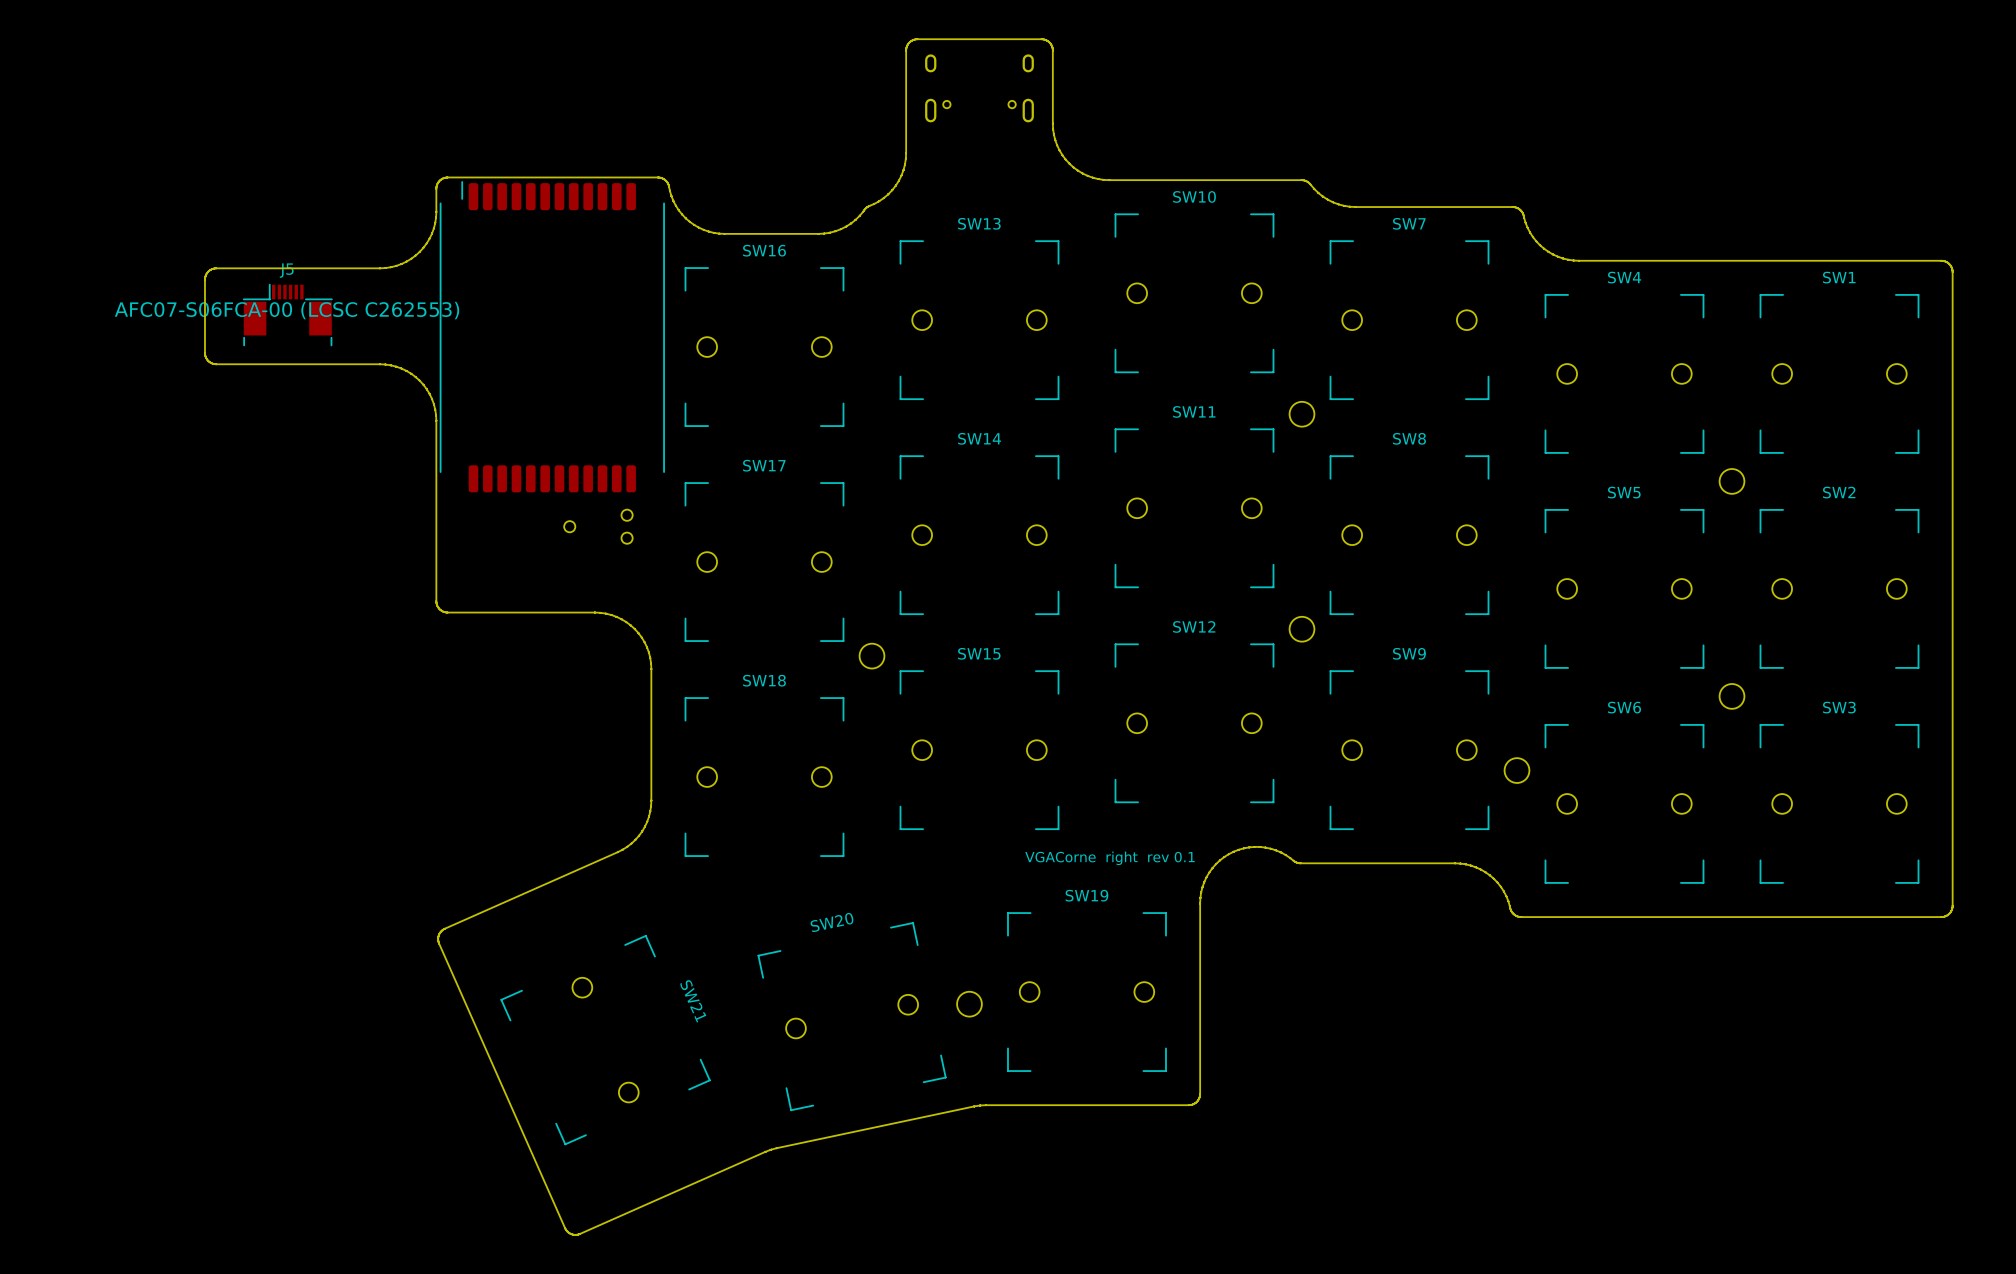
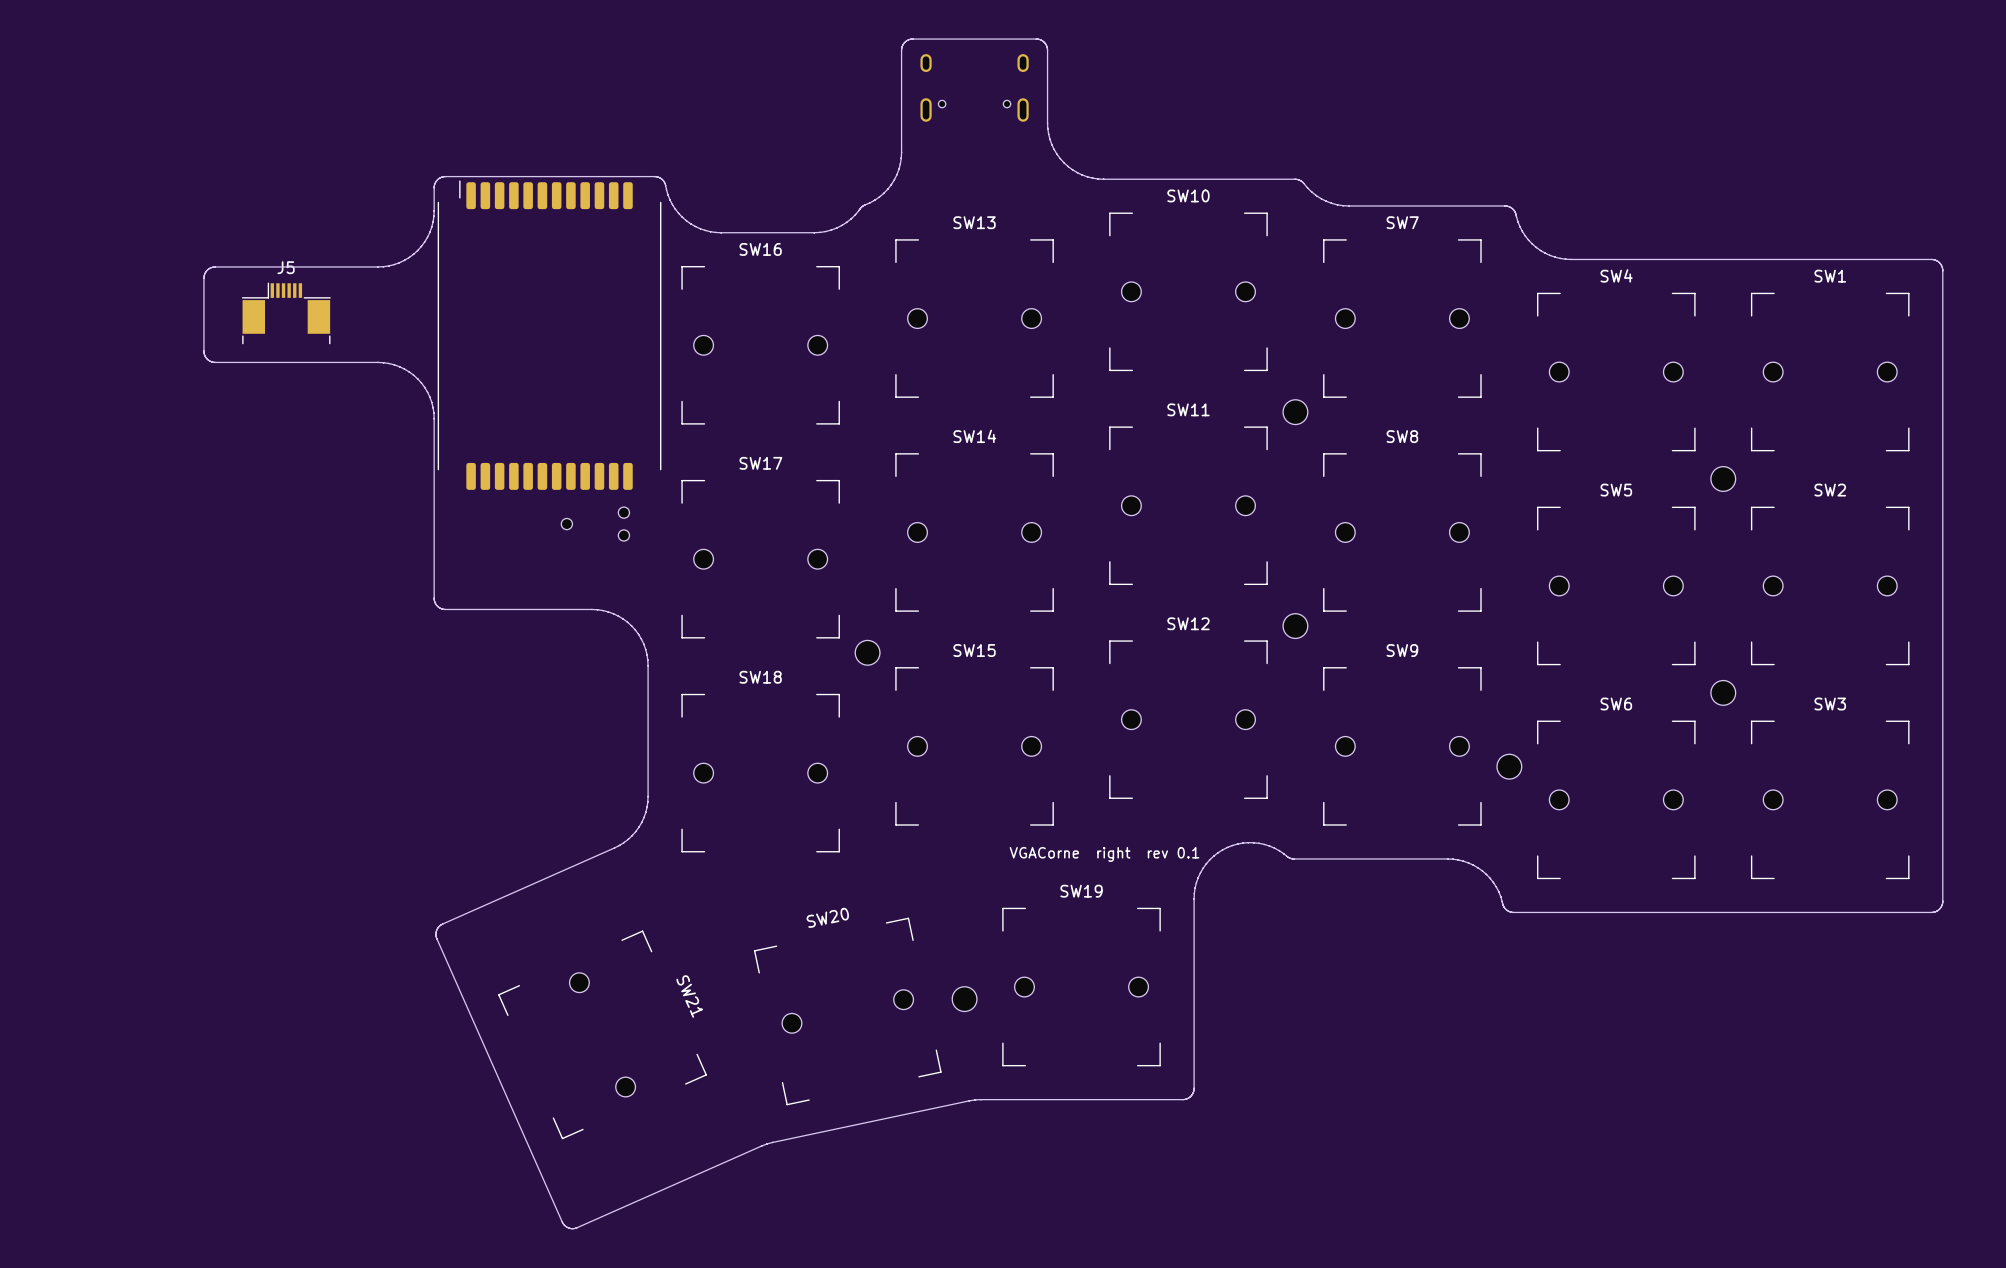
J5 text: AFC07-S06FCA-00 (LCSC C262553) (287, 310) -> none

